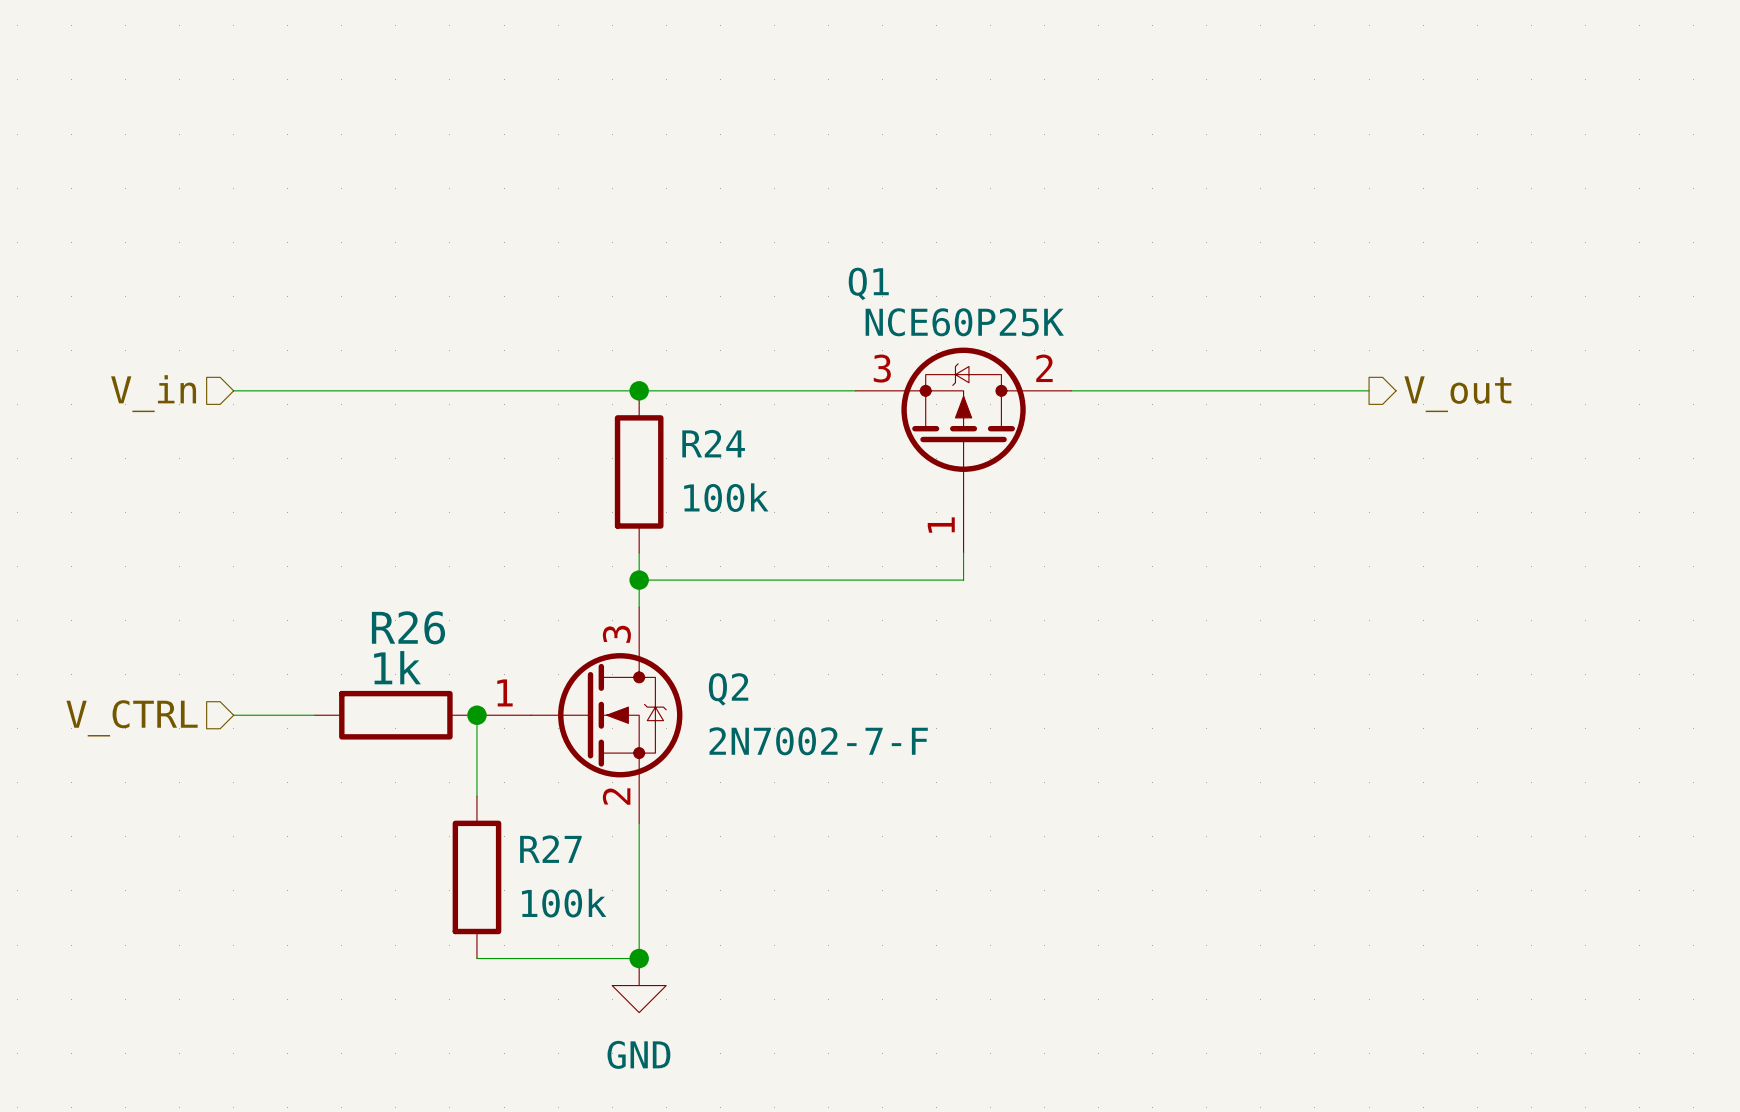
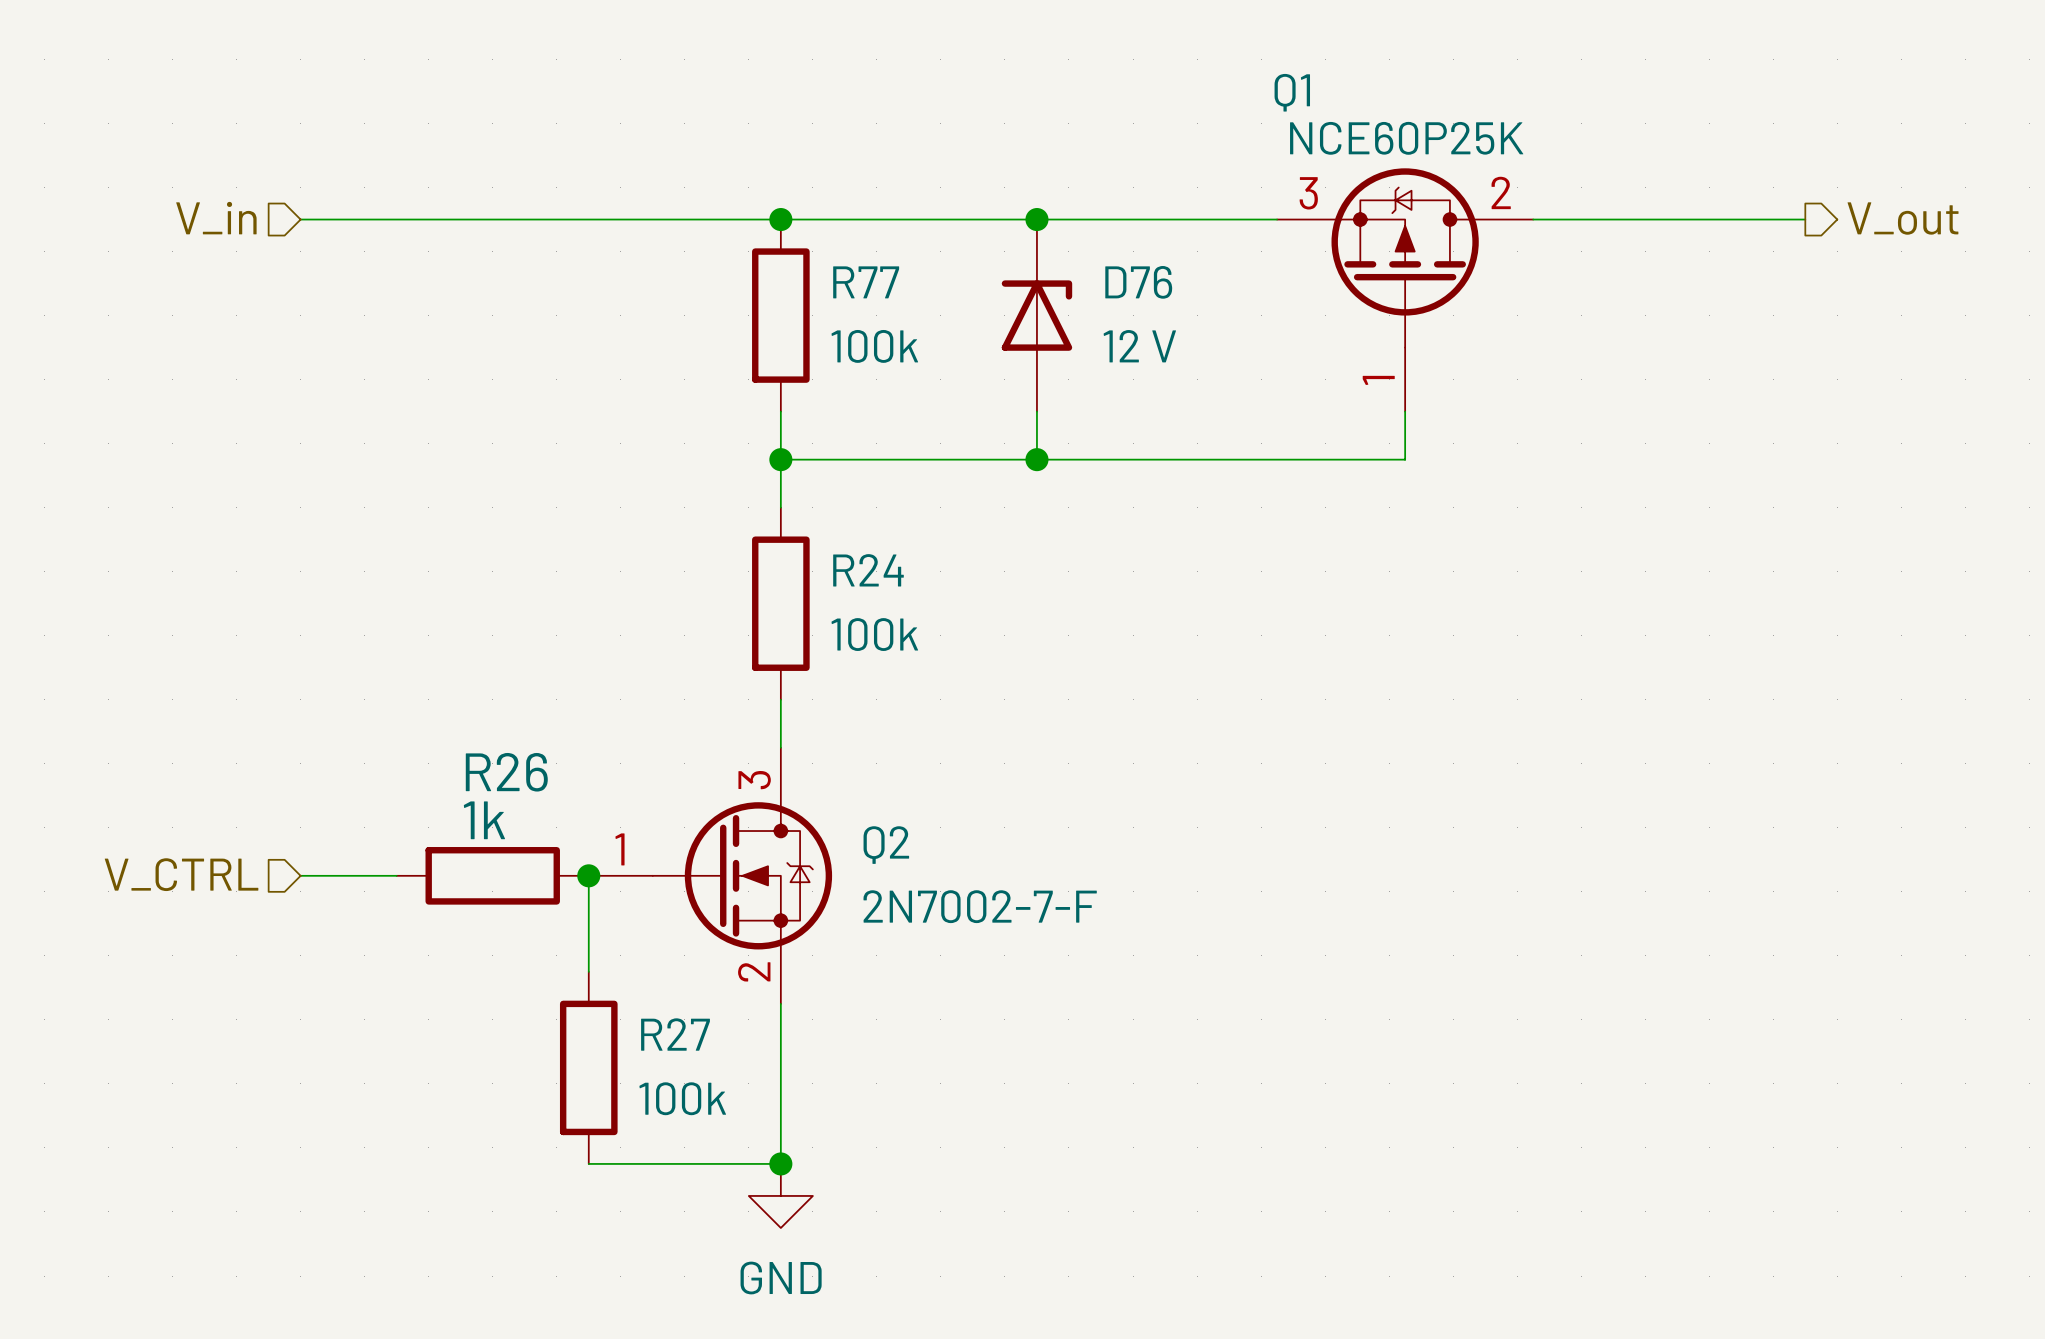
wire: none -> (300, 219) (1277, 219)
junction: none -> (780, 219)
junction: none -> (1036, 219)
wire: none -> (1533, 219) (1805, 219)
R77: none -> 100k (780, 315)
D76: none -> 12 V (1036, 315)
wire: none -> (780, 411) (780, 507)
wire: none -> (1036, 411) (1036, 459)
wire: none -> (1405, 411) (1405, 459) (780, 459)
junction: none -> (1036, 459)
wire: (233, 390) (855, 390) -> none
junction position: (639, 390) -> (780, 459)
wire: (1071, 390) (1369, 390) -> none
hierarchical label position: V_in (153, 393) -> V_in (216, 218)
hierarchical label position: V_out (1457, 394) -> V_out (1903, 218)
Q1 position: (963, 450) -> (1405, 289)
R24 position: (639, 471) -> (780, 603)
wire: (963, 553) (963, 580) (639, 580) -> none
junction: (639, 580) -> none

